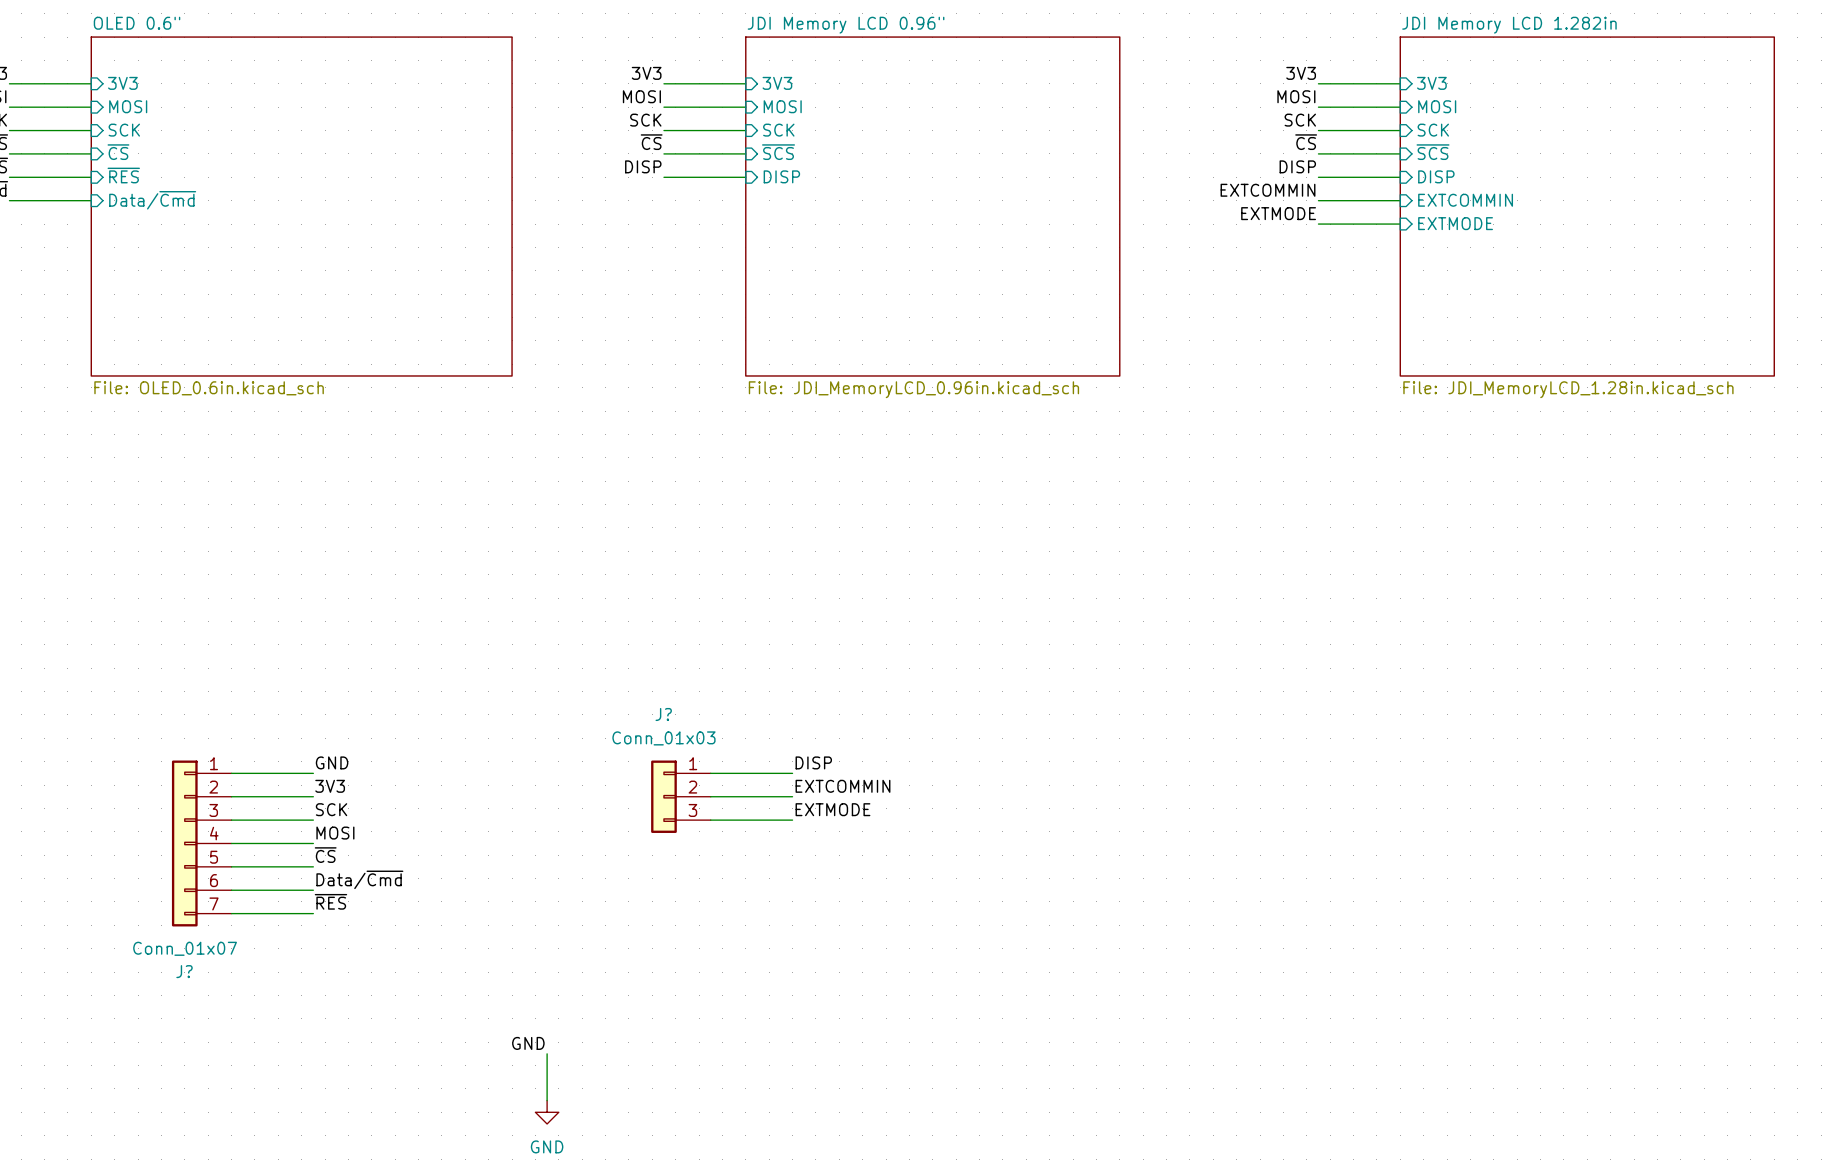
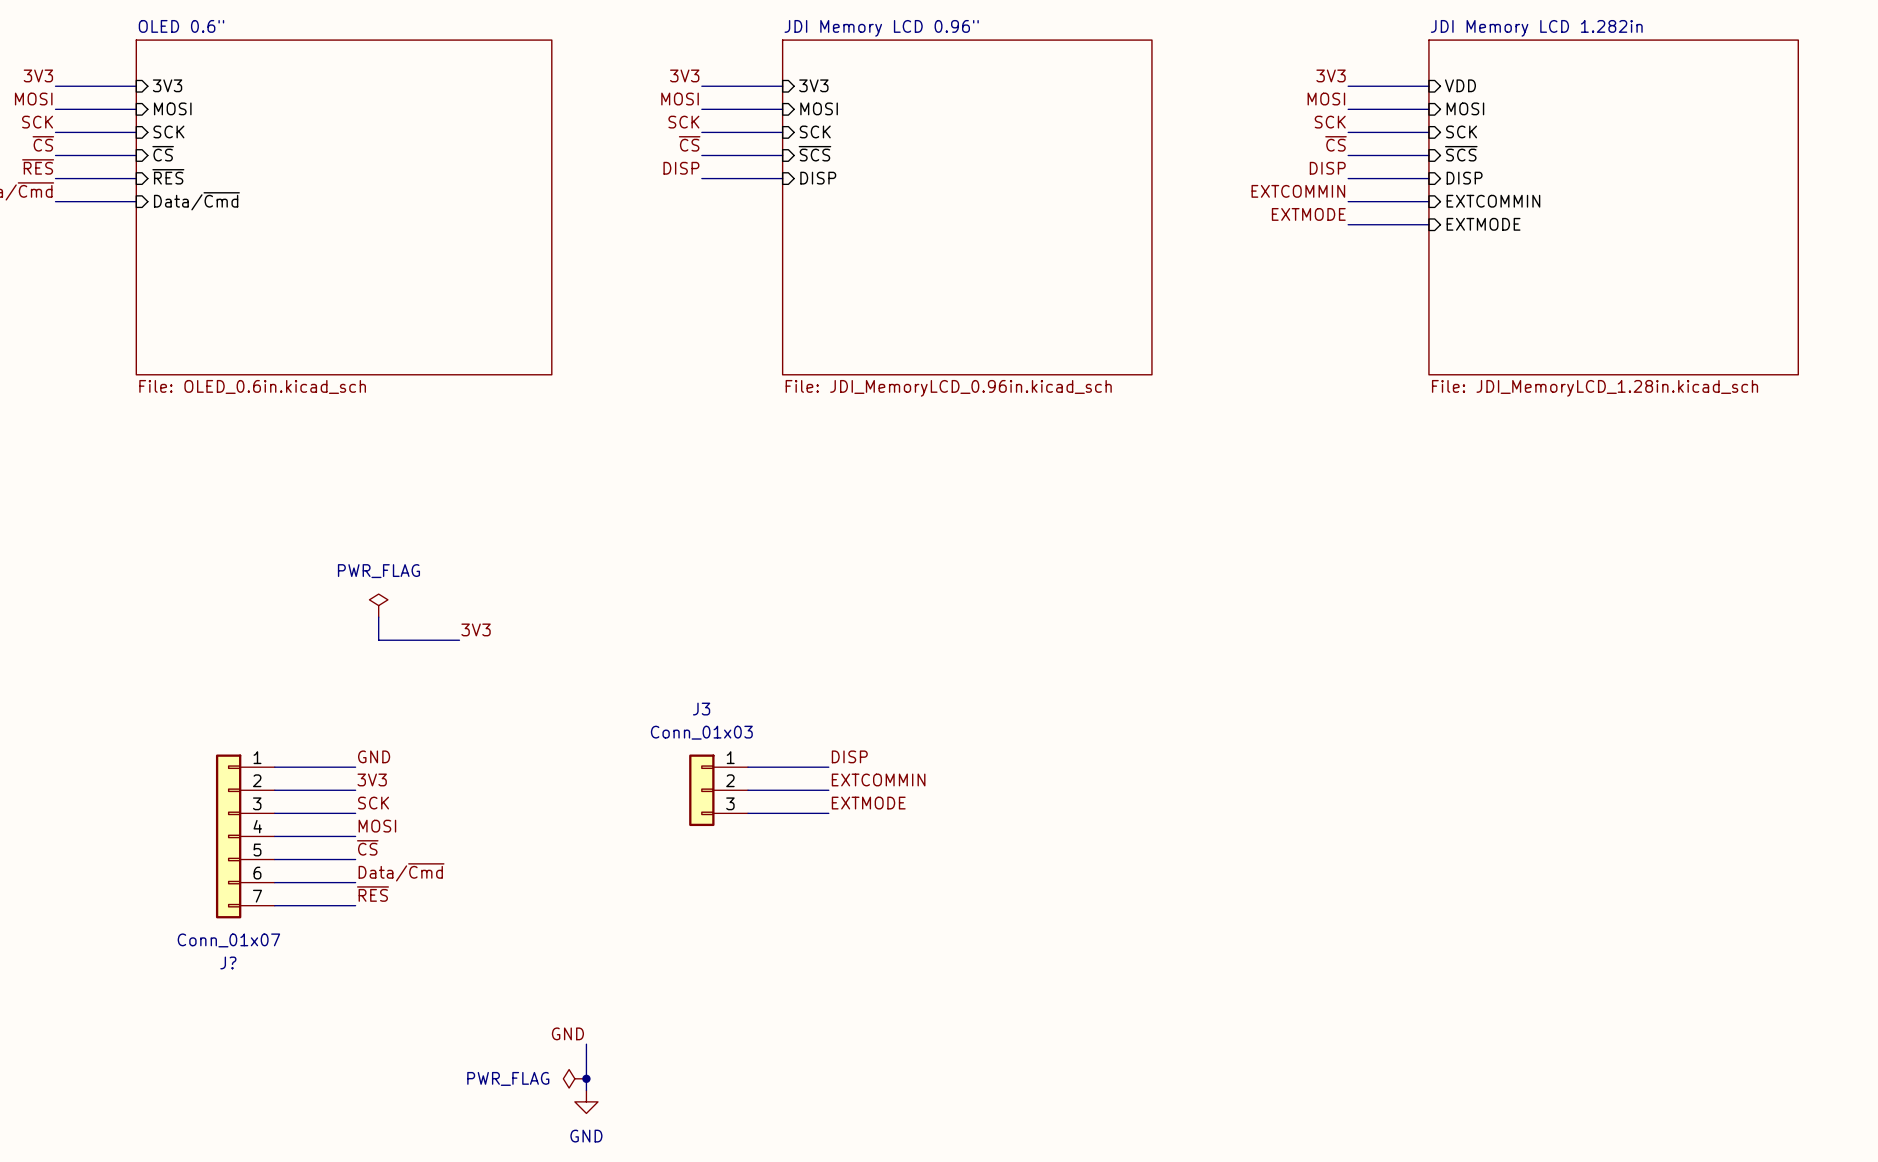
sheet pin: 3V3 (1431, 83) -> VDD (1460, 85)
power symbol: none -> PWR_FLAG (378, 605)
wire: none -> (378, 617) (378, 640) (459, 640)
label: none -> 3V3 (476, 629)
J? name: J? (663, 714) -> J3 (701, 709)
power symbol: none -> PWR_FLAG (574, 1078)
junction: none -> (586, 1078)

